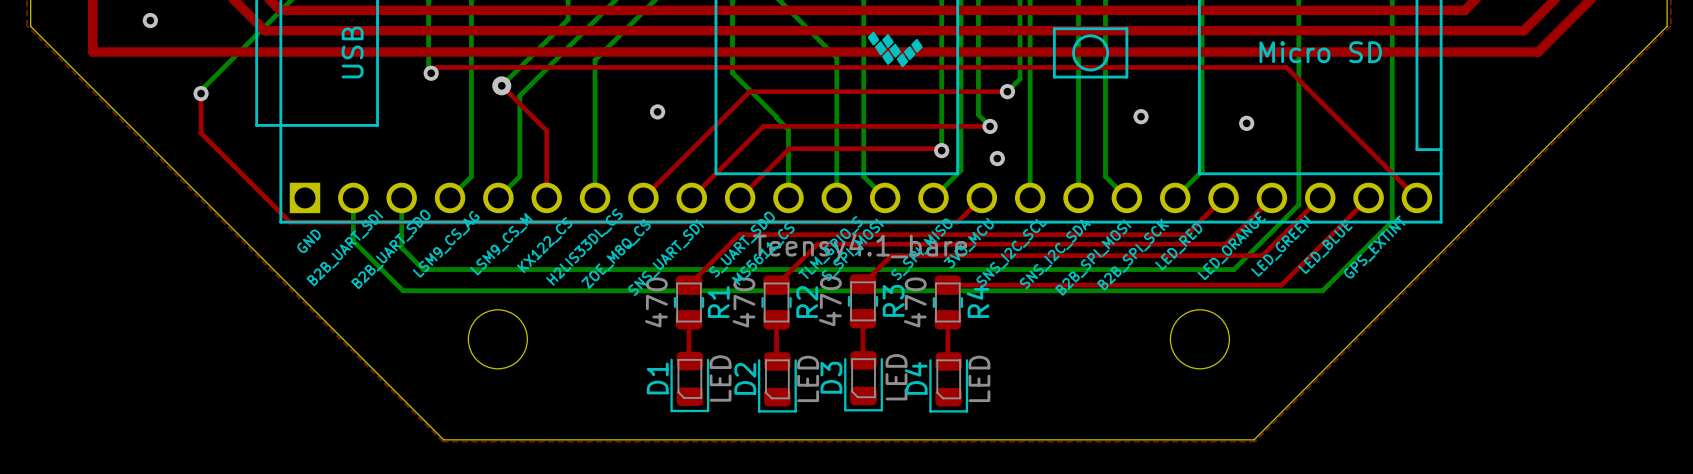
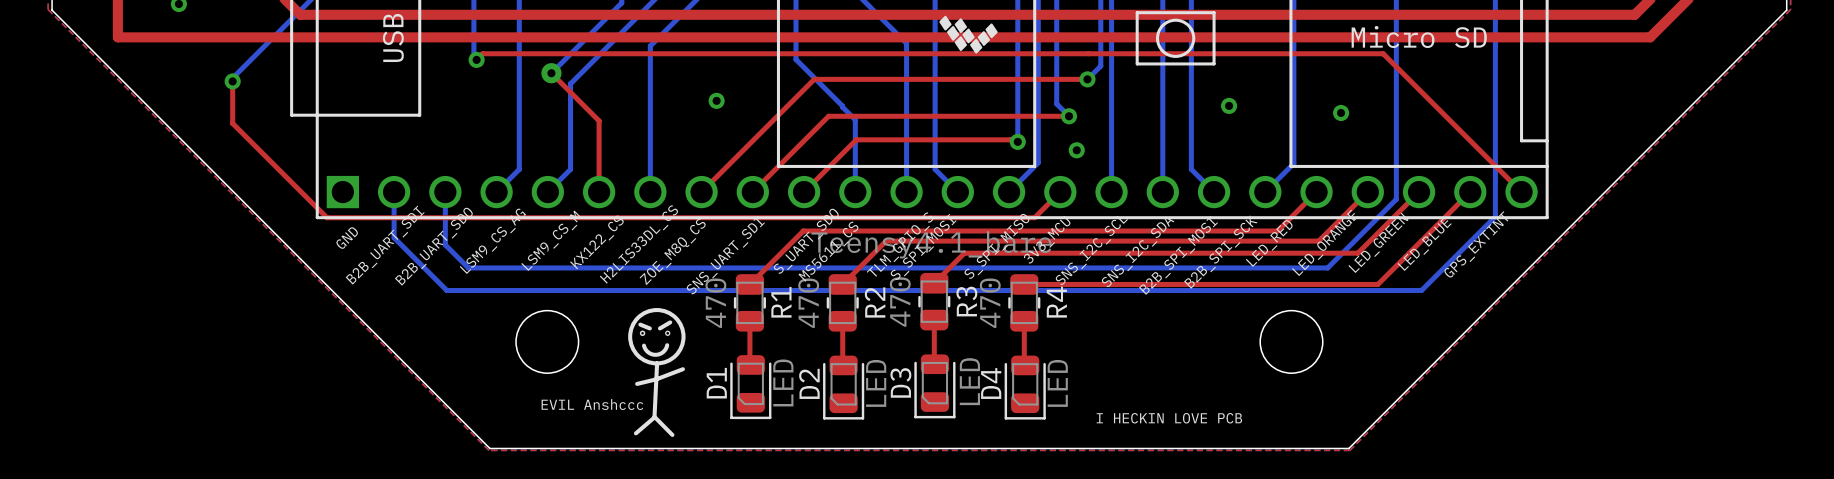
drawing: none -> [628, 308, 686, 366]
line: none -> (670, 322) (659, 328)
line: none -> (640, 324) (649, 328)
line: none -> (667, 345) (662, 352) (655, 354) (647, 351) (643, 345)
line: none -> (657, 363) (654, 417) (635, 433)
line: none -> (682, 369) (656, 379) (637, 383)
text: none -> EVIL Anshccc (592, 404)
line: none -> (654, 416) (672, 434)
text: none -> I HECKIN LOVE PCB (1169, 418)

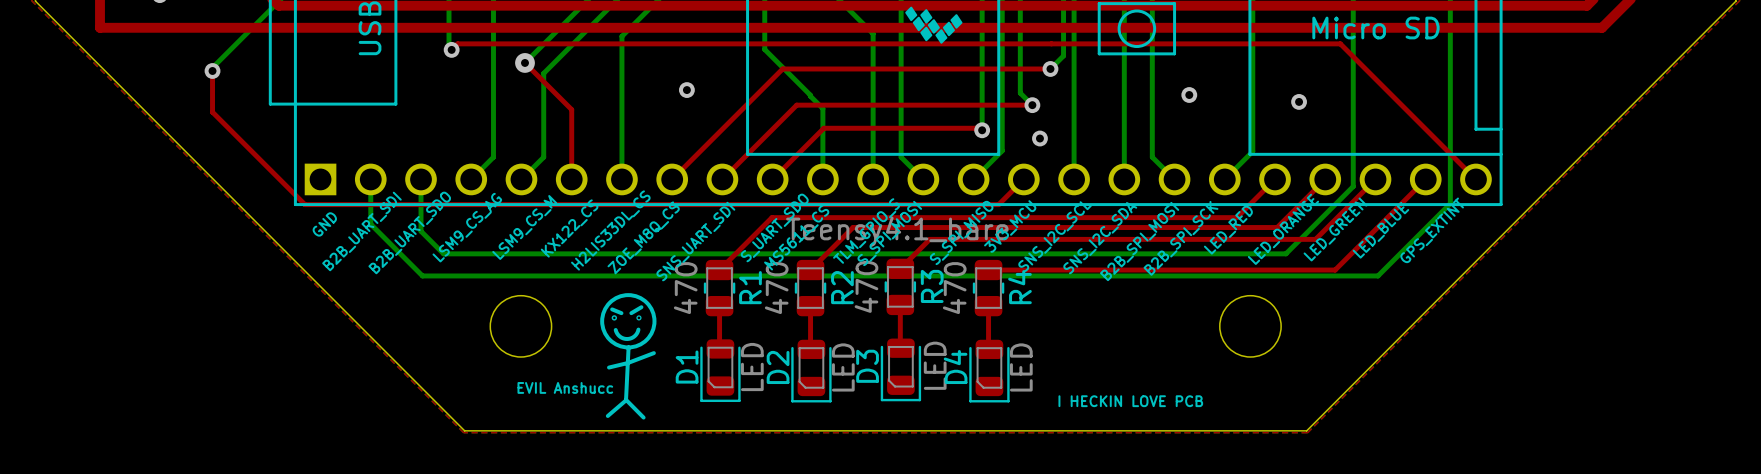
text: EVIL Anshccc (592, 404) -> EVIL Anshucc (565, 387)

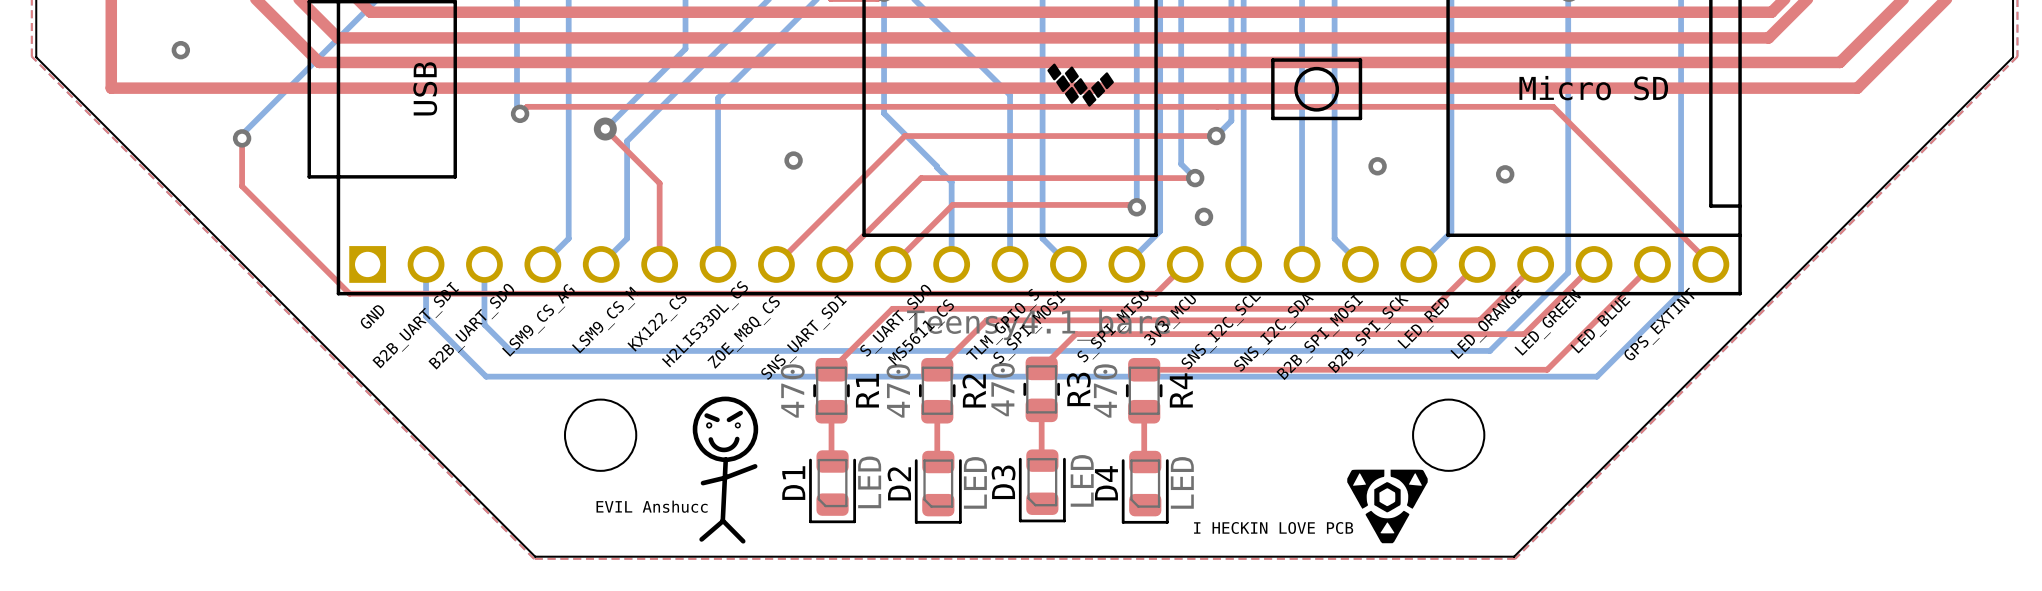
drawing: none -> [1347, 469, 1428, 544]
text position: I HECKIN LOVE PCB (1130, 401) -> I HECKIN LOVE PCB (1273, 527)

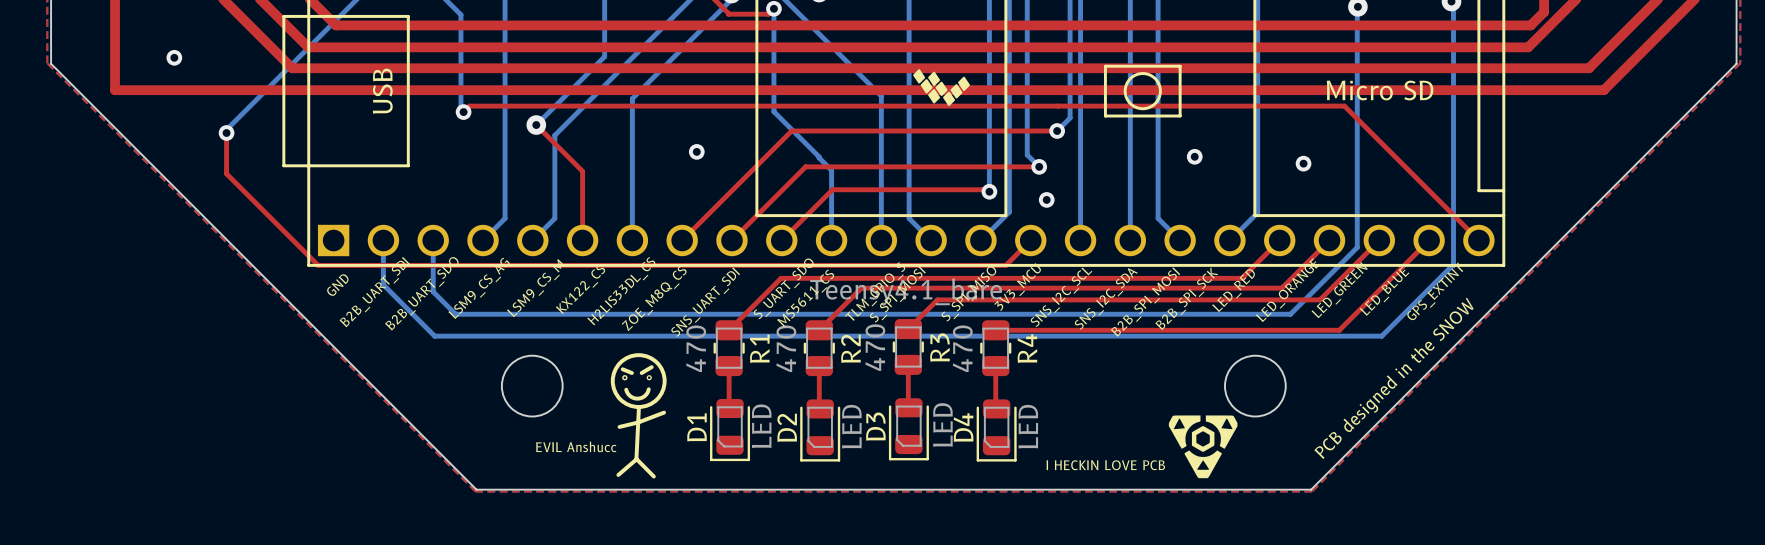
text: none -> PCB designed in the SNOW (1393, 378)

